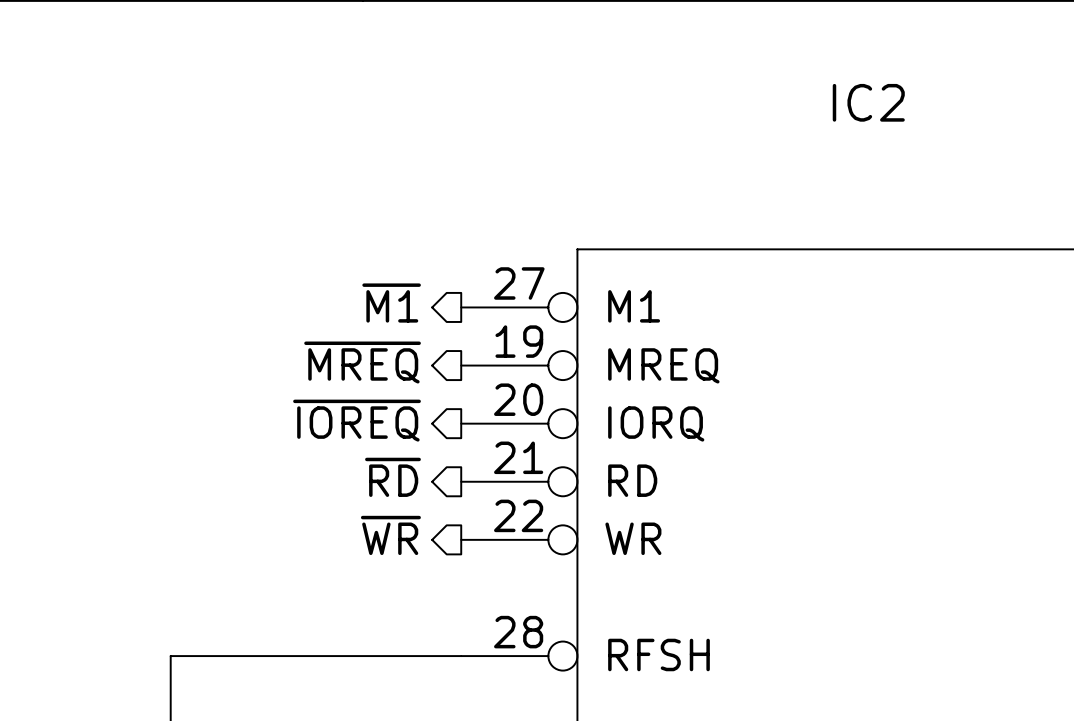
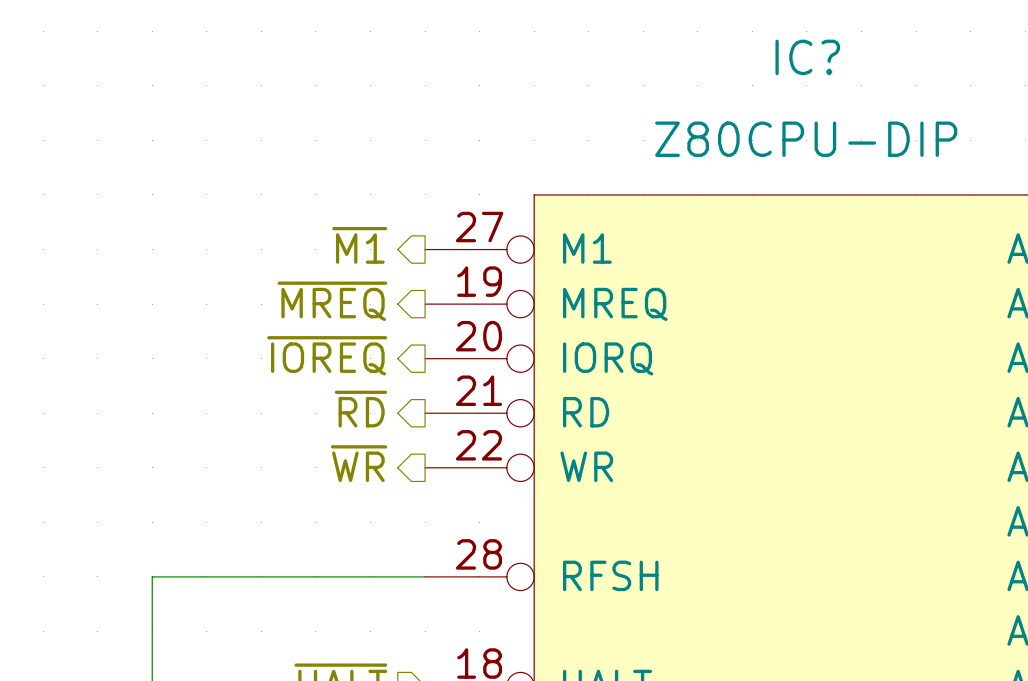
IC2 name: IC2 (868, 102) -> IC? (807, 57)
IC2 value: none -> Z80CPU-DIP (806, 139)

